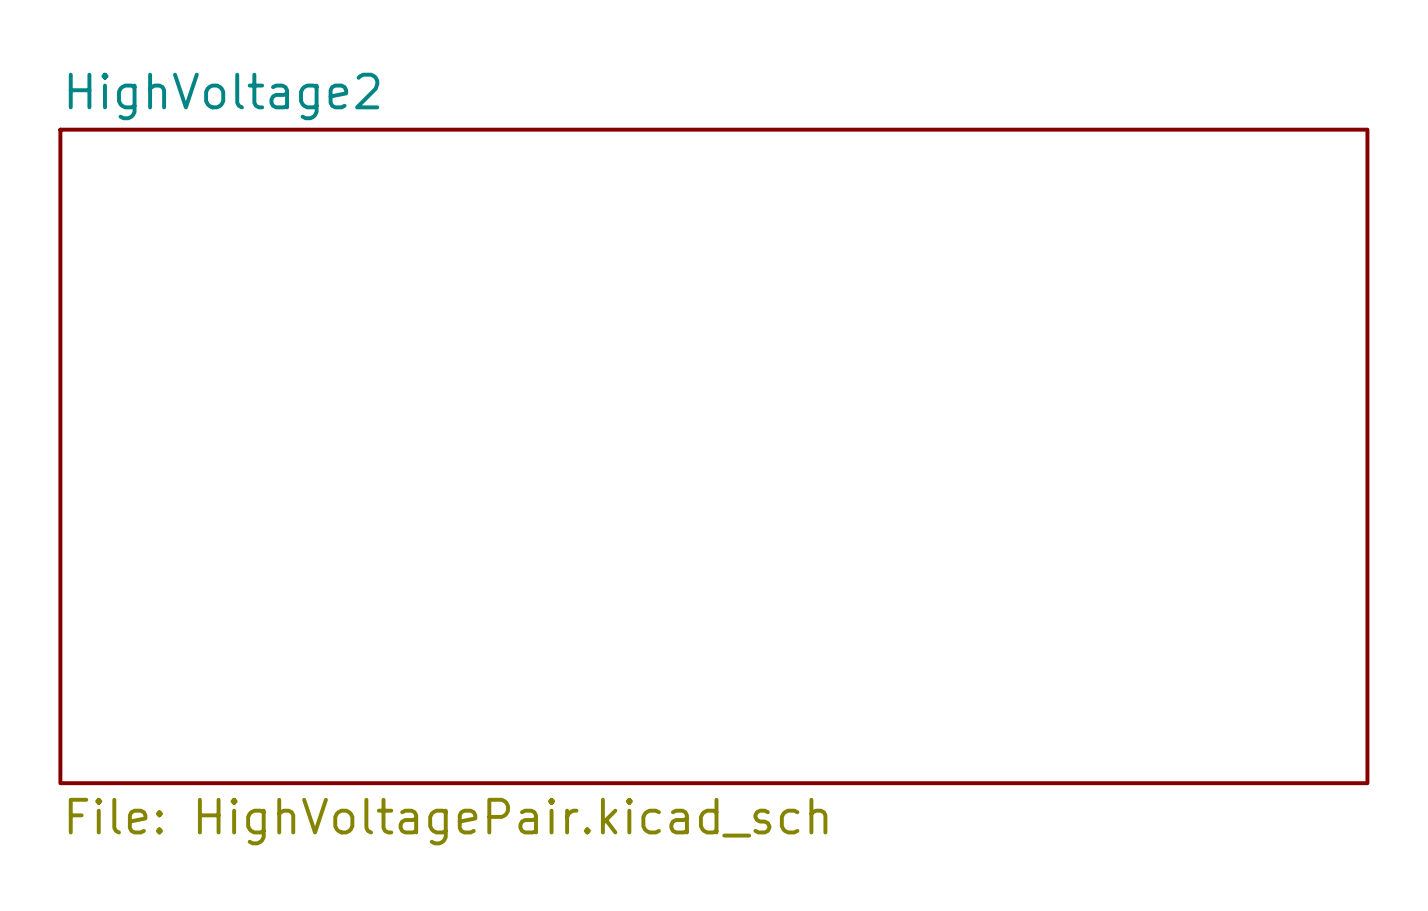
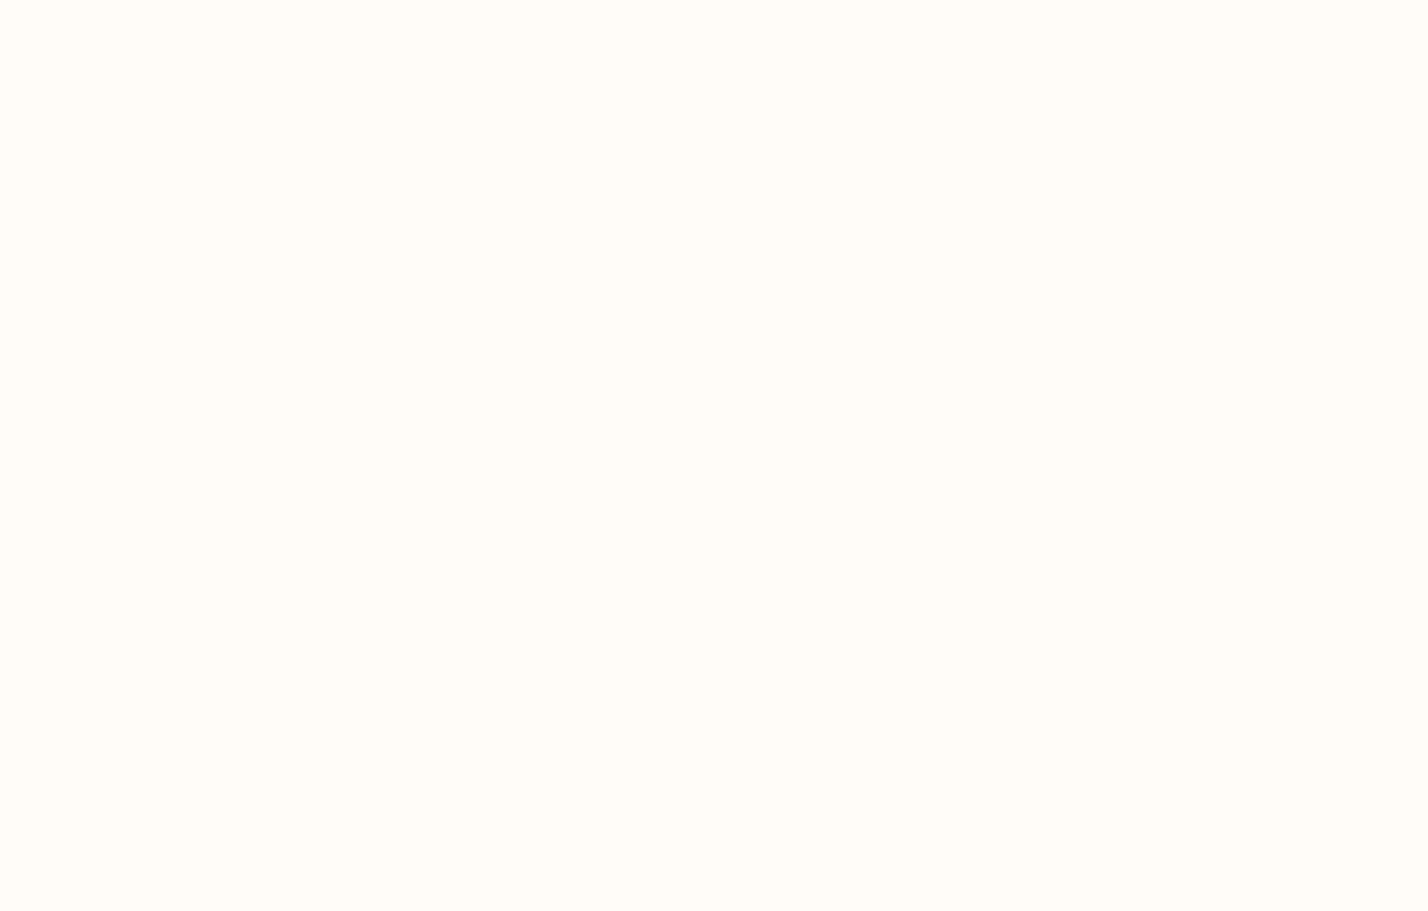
sheet HighVoltage2: File: HighVoltagePair.kicad_sch (713, 456) -> none

